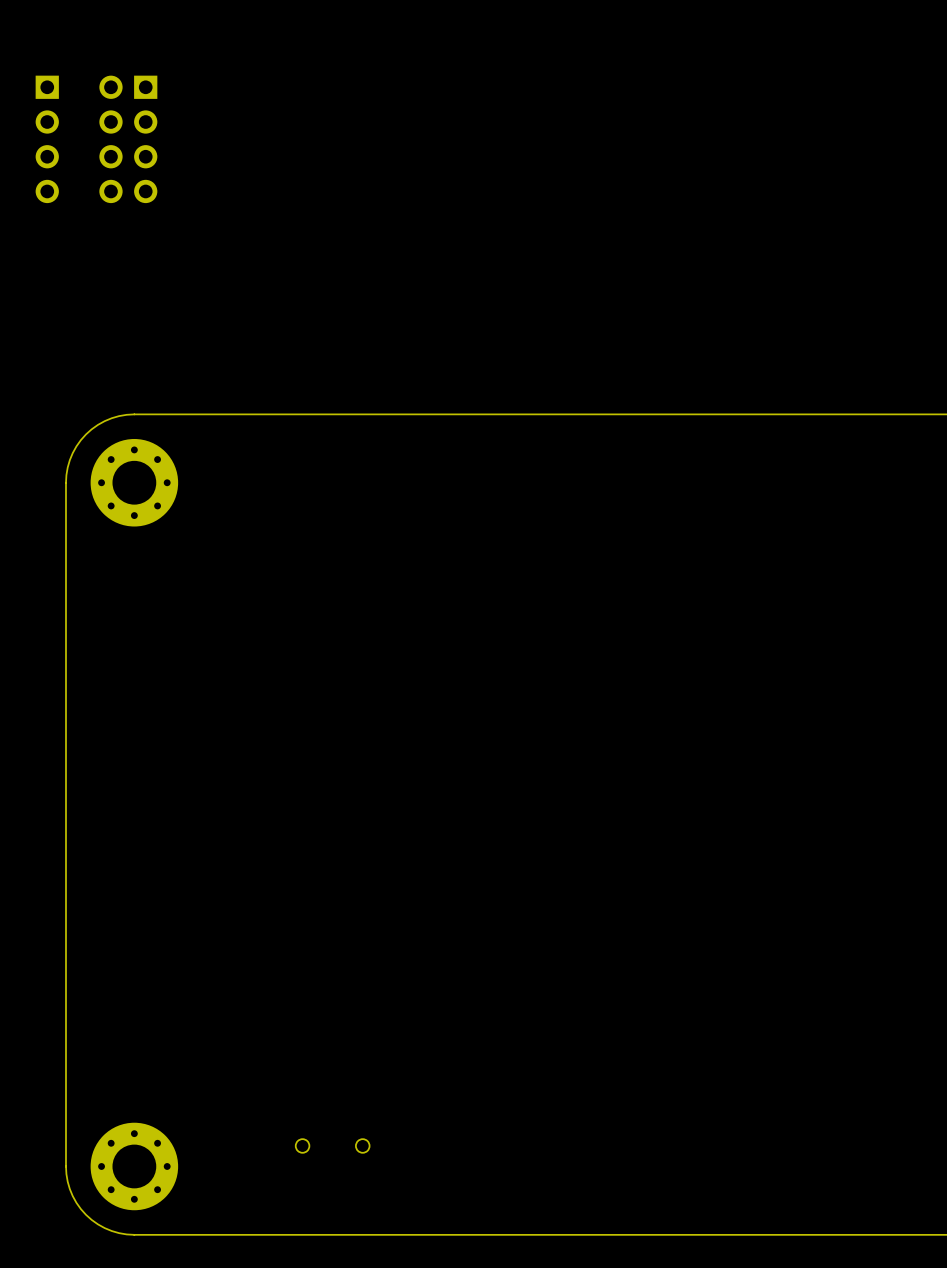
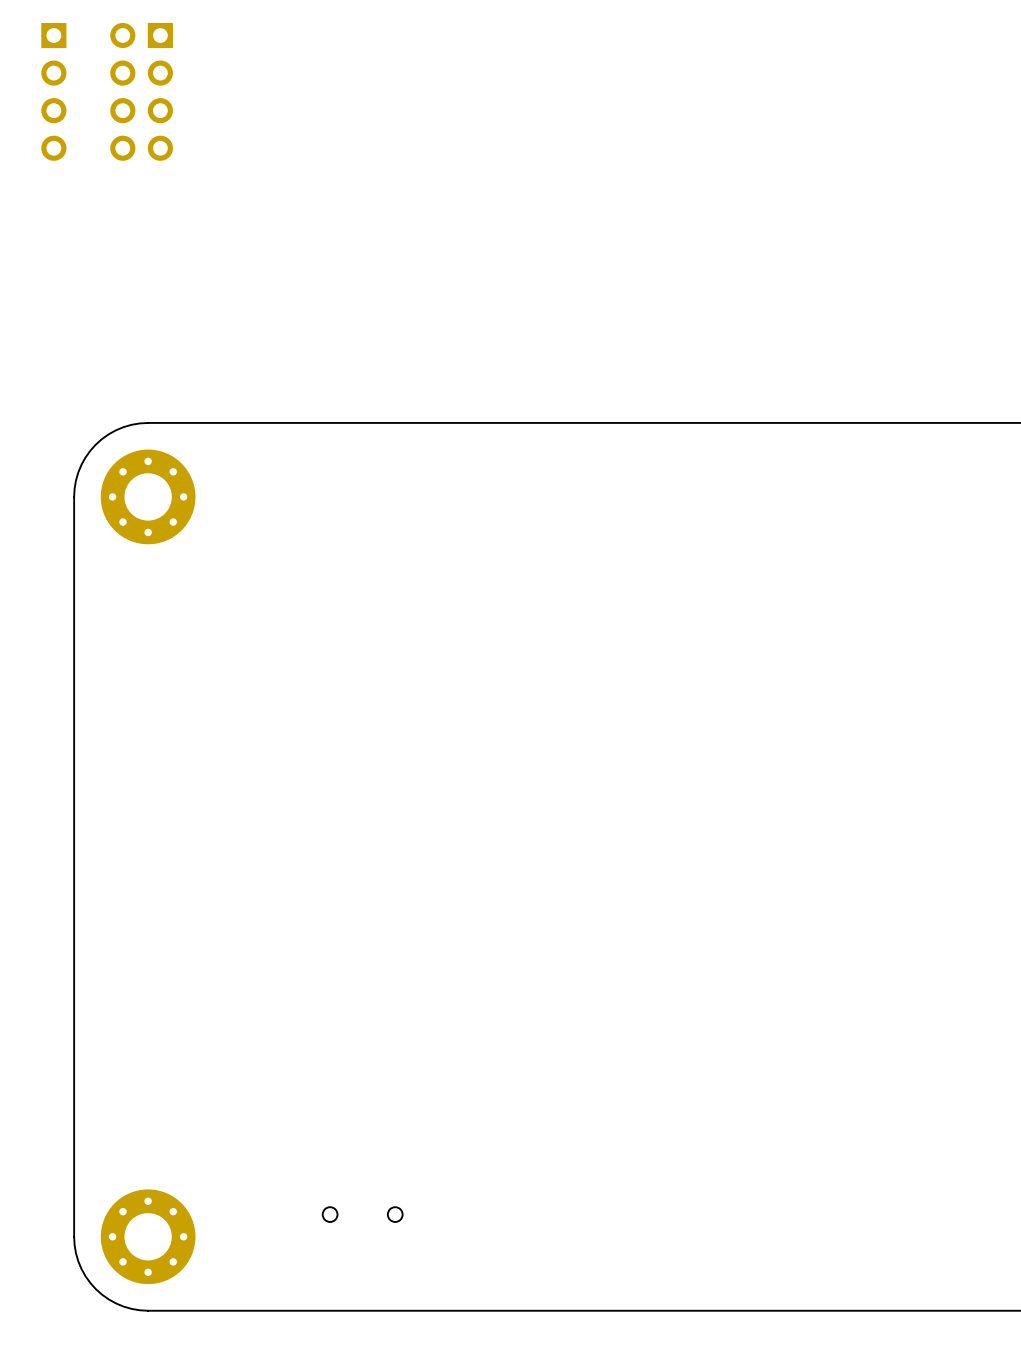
part position: (47, 139) -> (53, 91)
part position: (128, 139) -> (141, 91)

